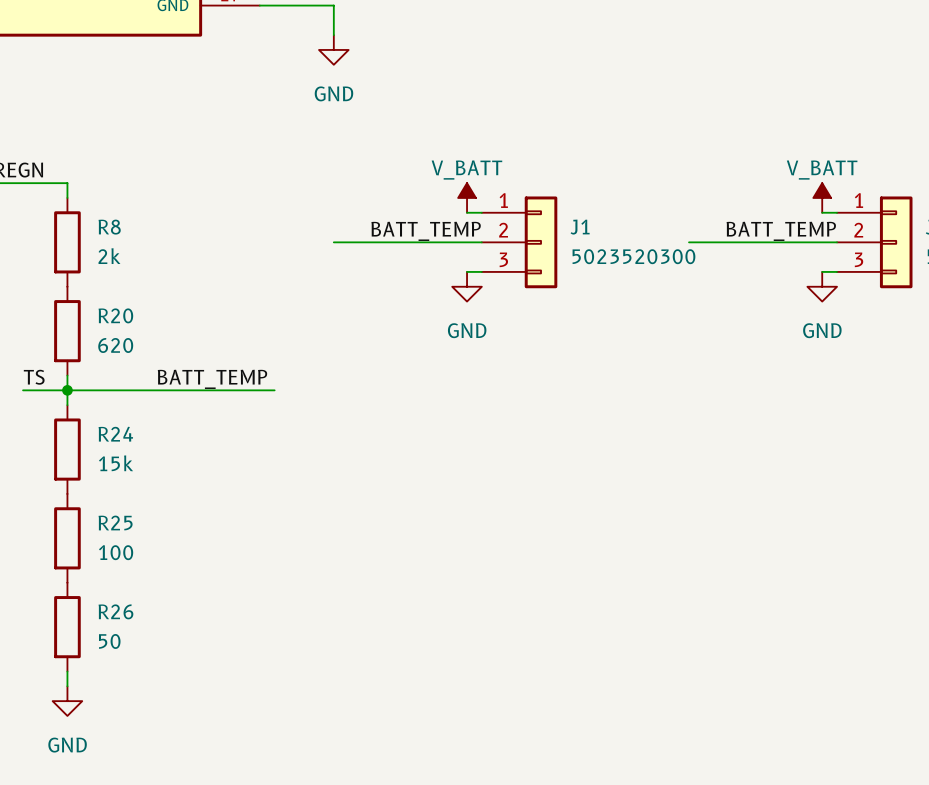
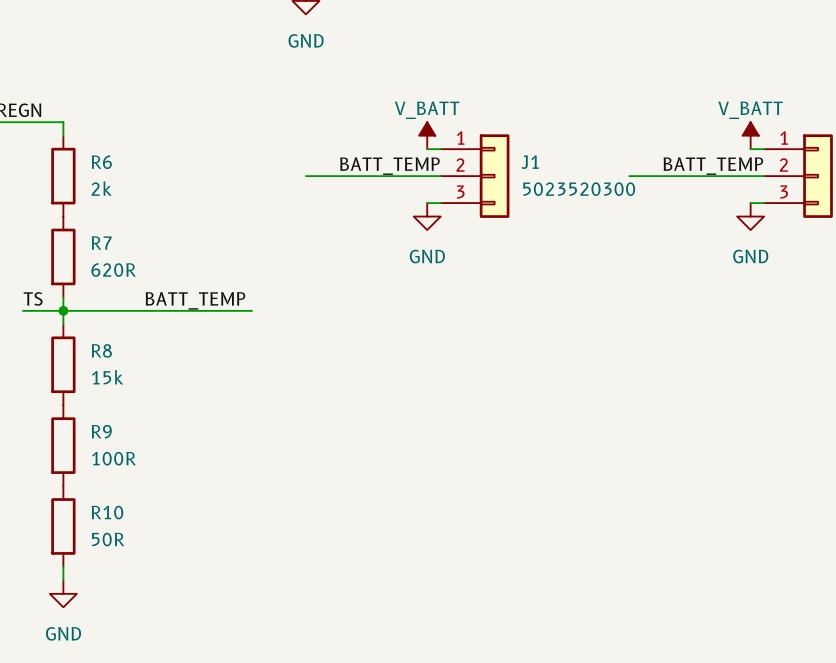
R8 name: R8 (109, 227) -> R6 (101, 162)
R20 name: R20 (115, 315) -> R7 (101, 243)
R20 value: 620 (115, 345) -> 620R (113, 270)
R24 name: R24 (115, 434) -> R8 (101, 350)
R25 name: R25 (115, 523) -> R9 (101, 431)
R25 value: 100 (116, 552) -> 100R (113, 458)
R26 name: R26 (115, 611) -> R10 (107, 512)
R26 value: 50 (109, 641) -> 50R (108, 539)

